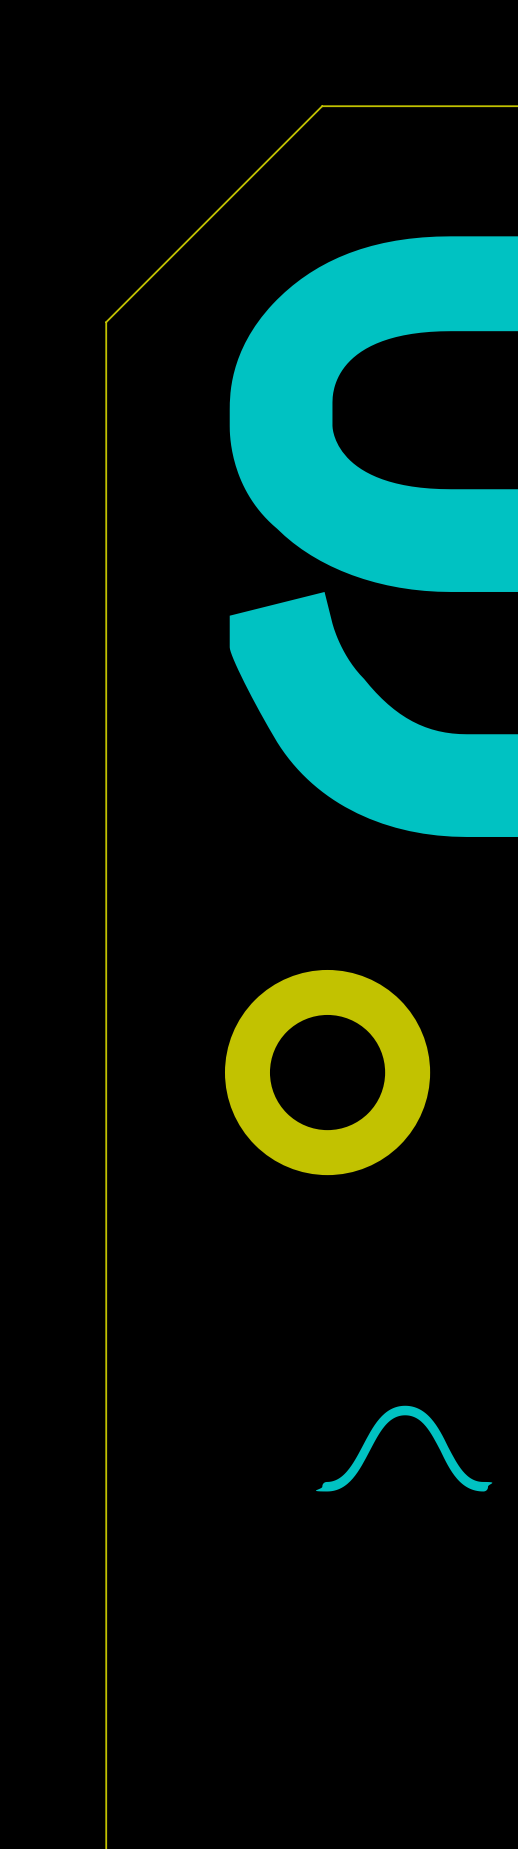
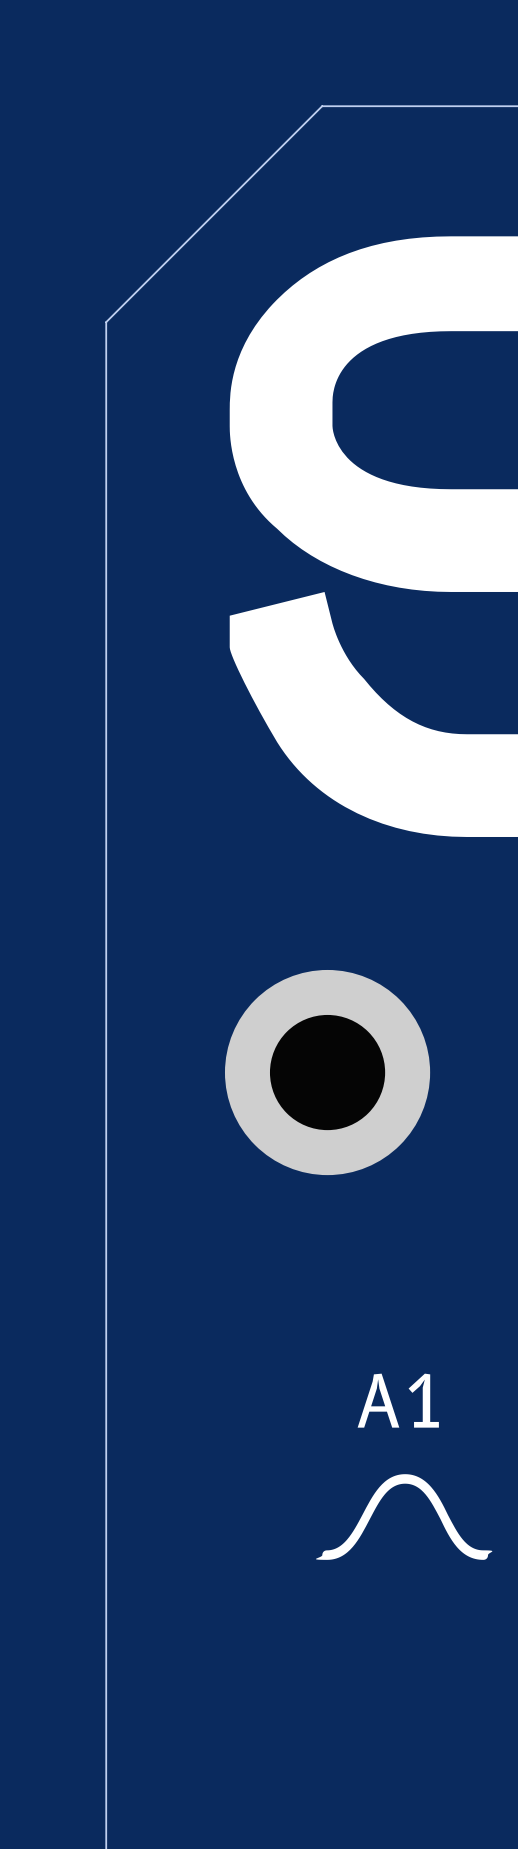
text: none -> A1 (398, 1400)
drawing position: (404, 1448) -> (404, 1517)

